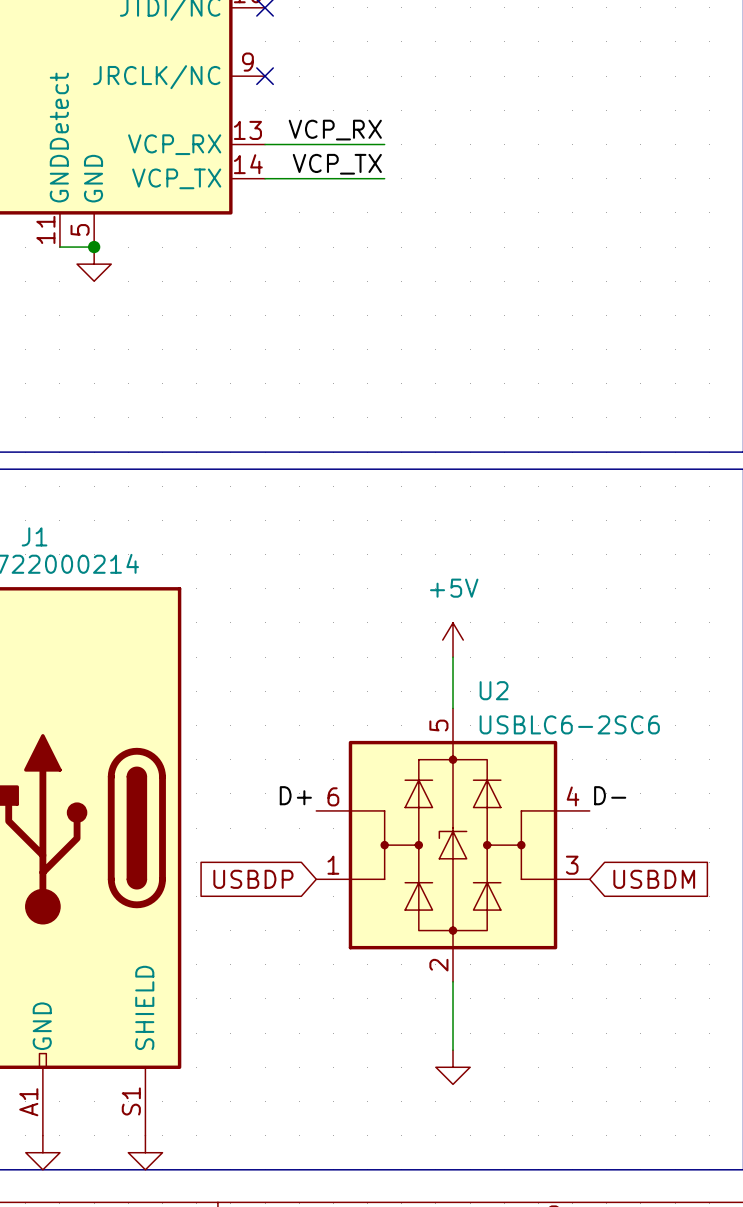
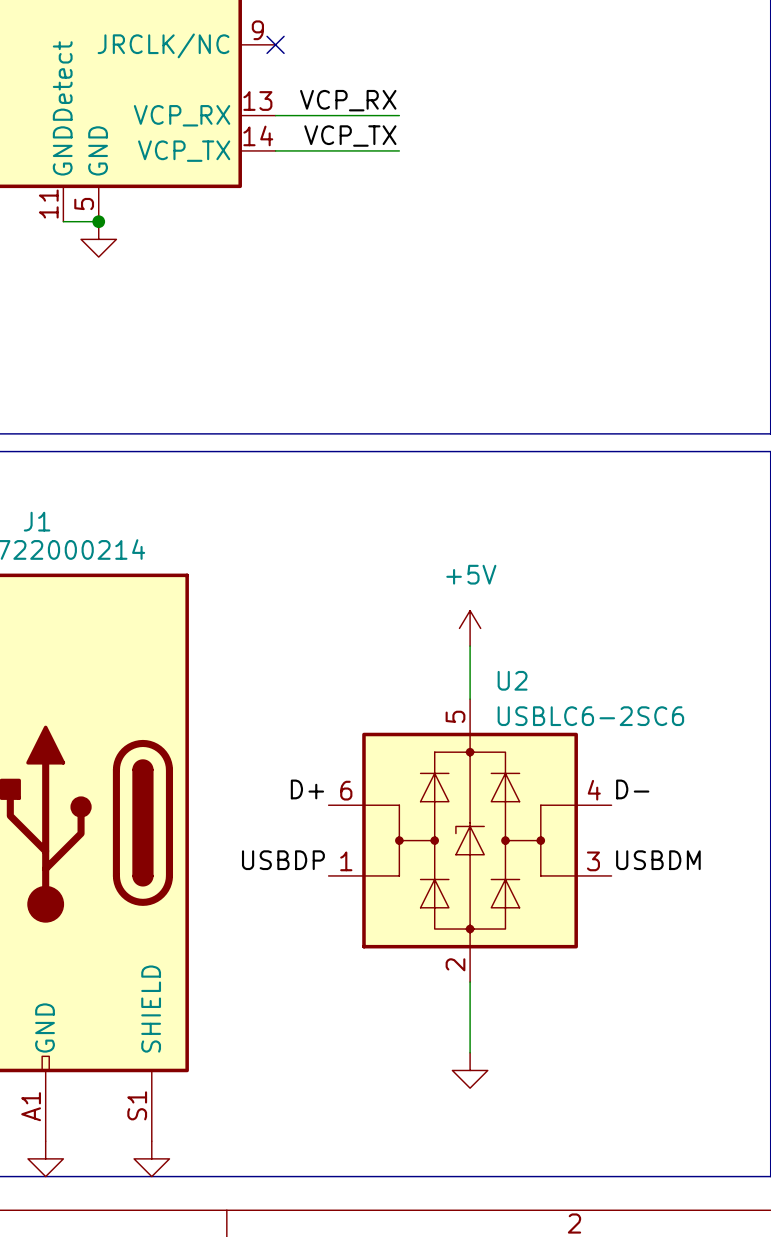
label: none -> USBDP (283, 860)
label: none -> USBDM (658, 860)
global label: USBDP (253, 879) -> none
global label: USBDM (654, 879) -> none

